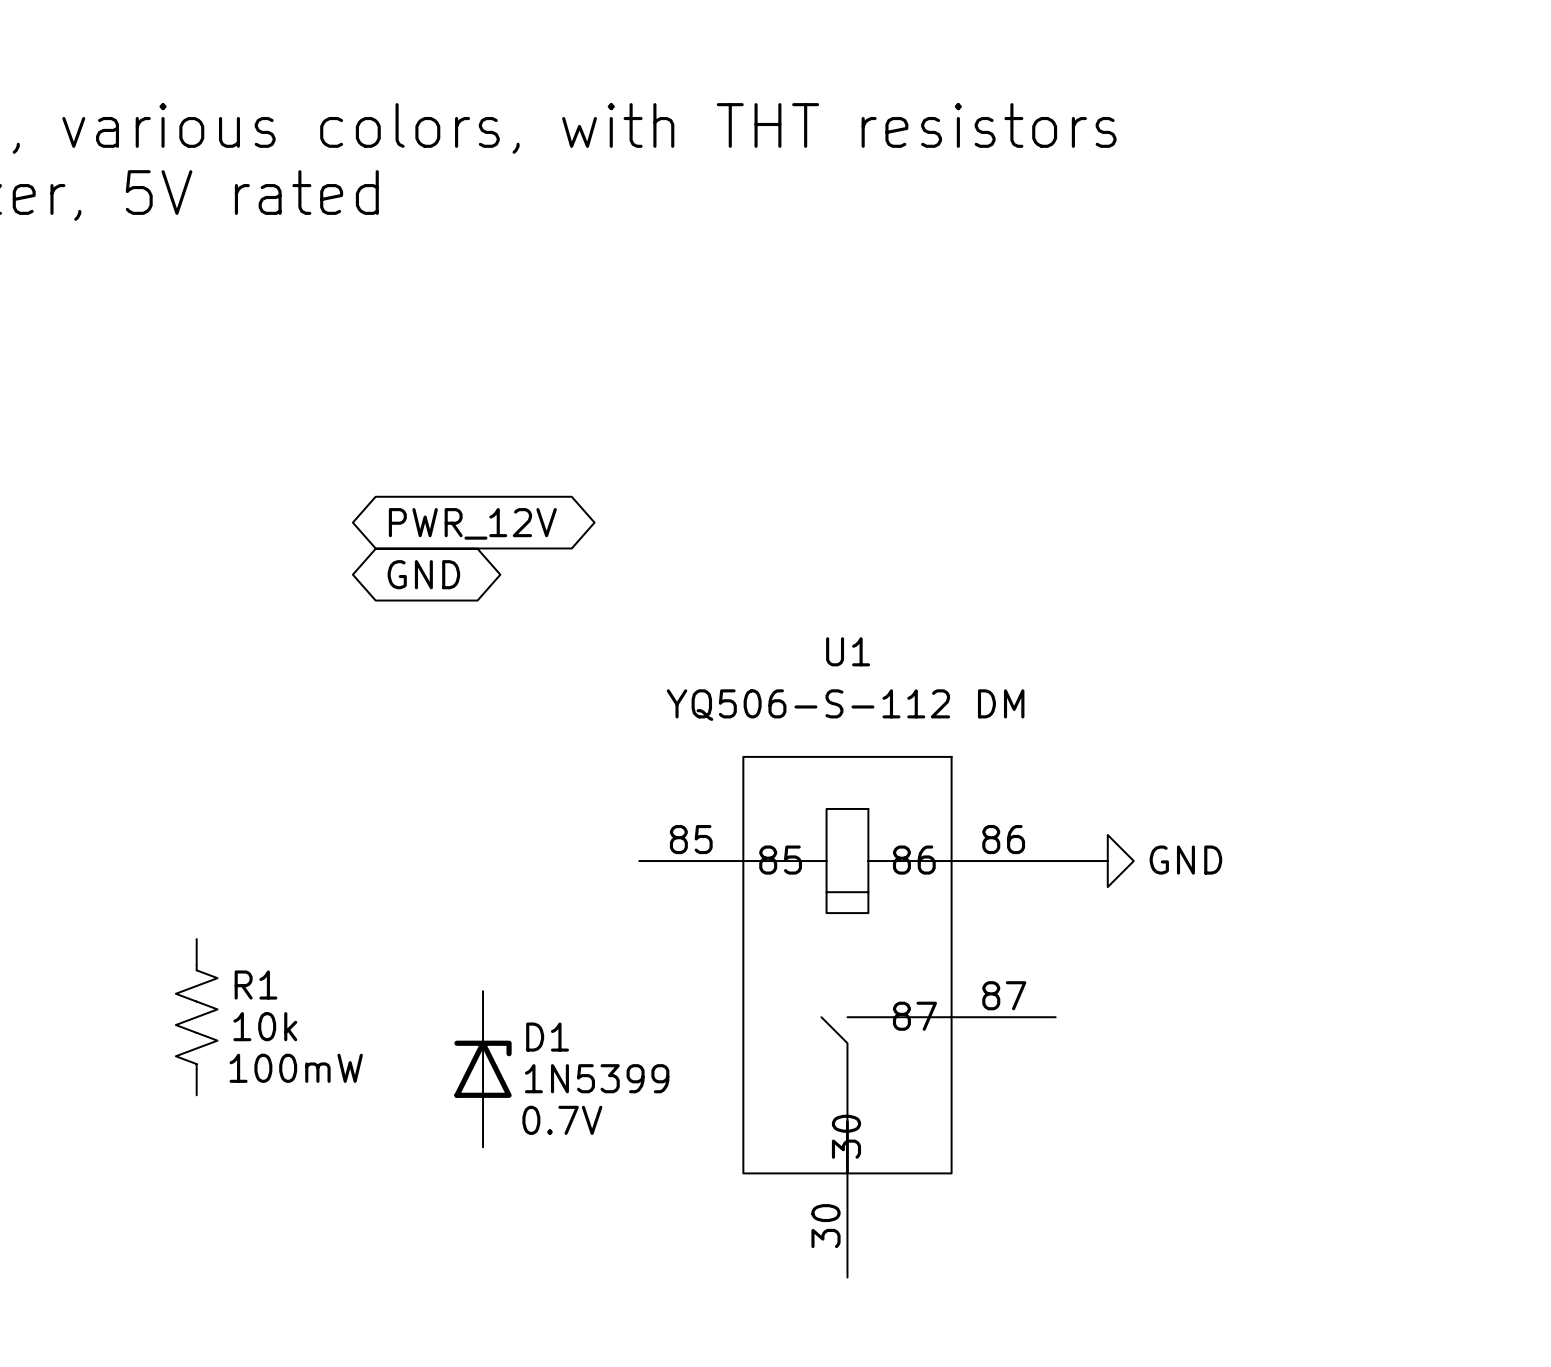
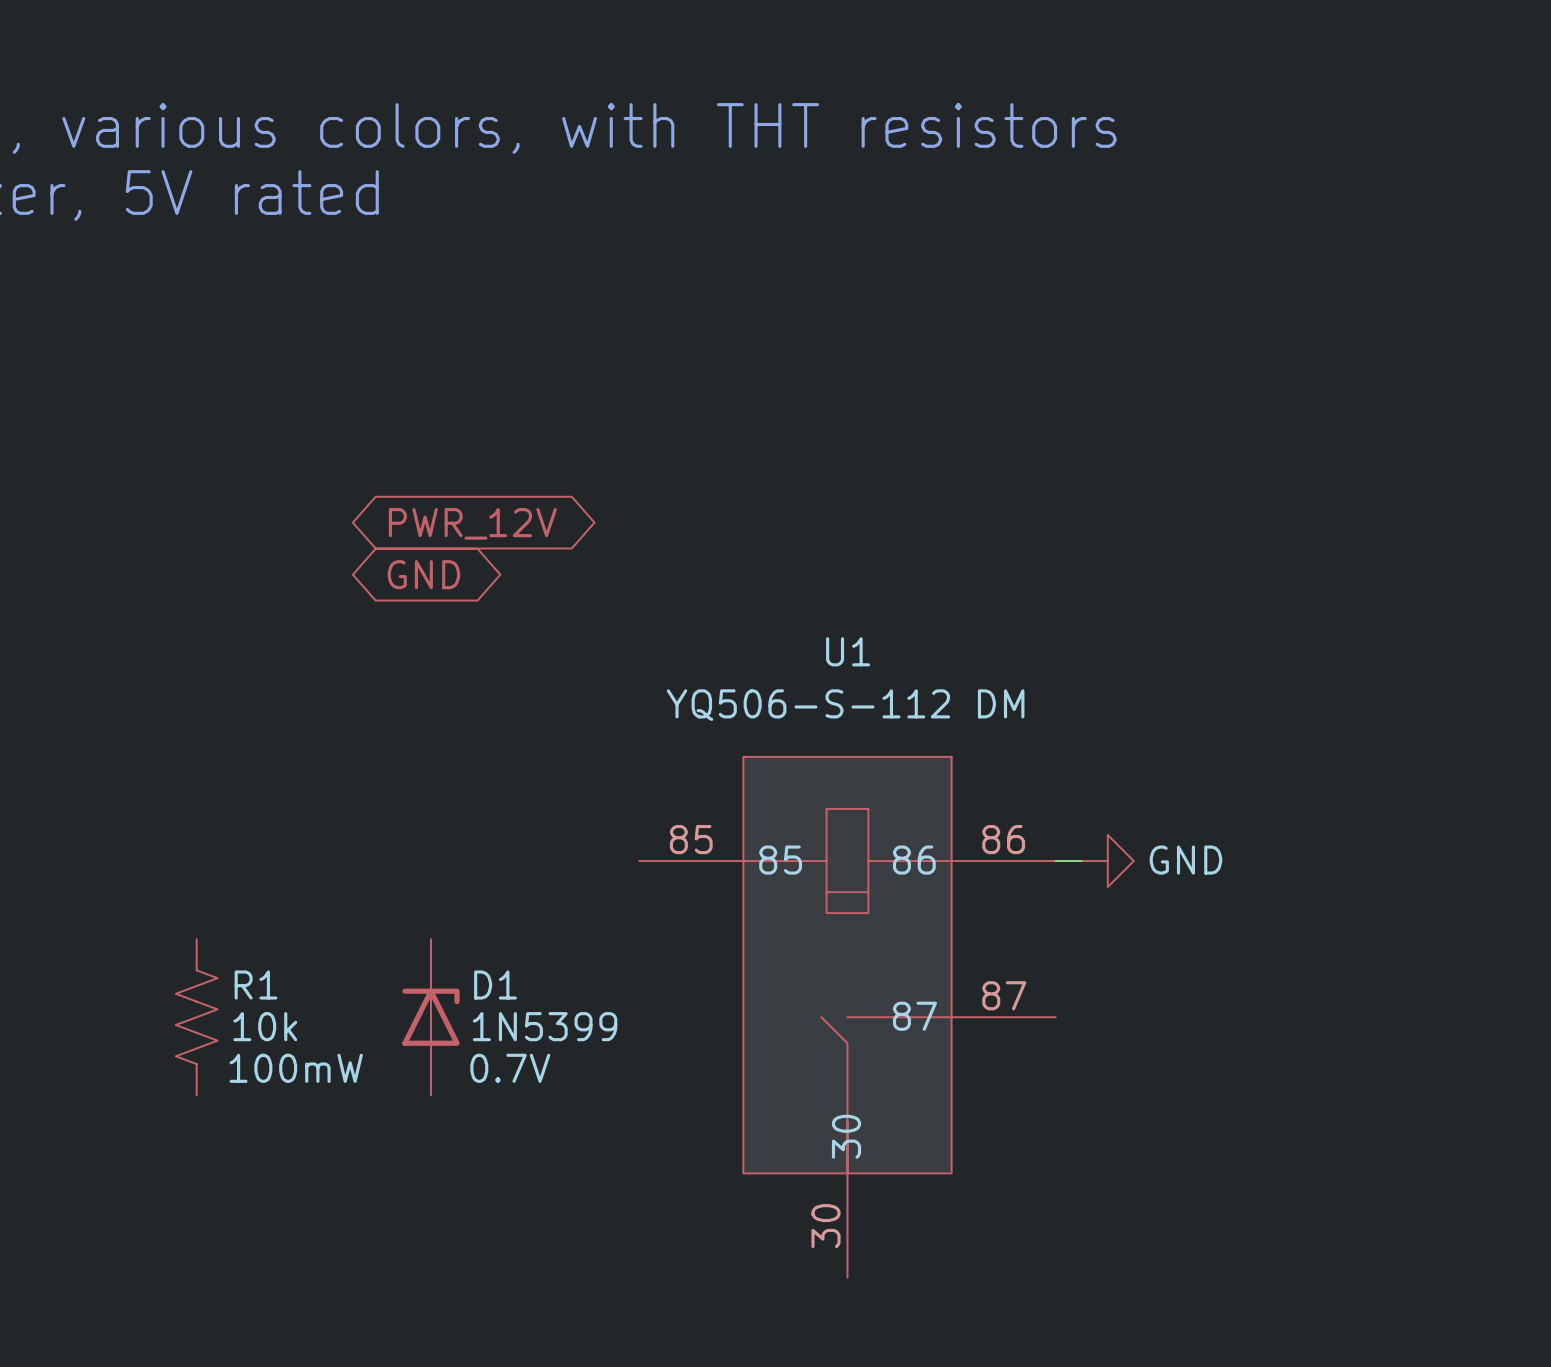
D1 position: (483, 1069) -> (430, 1017)

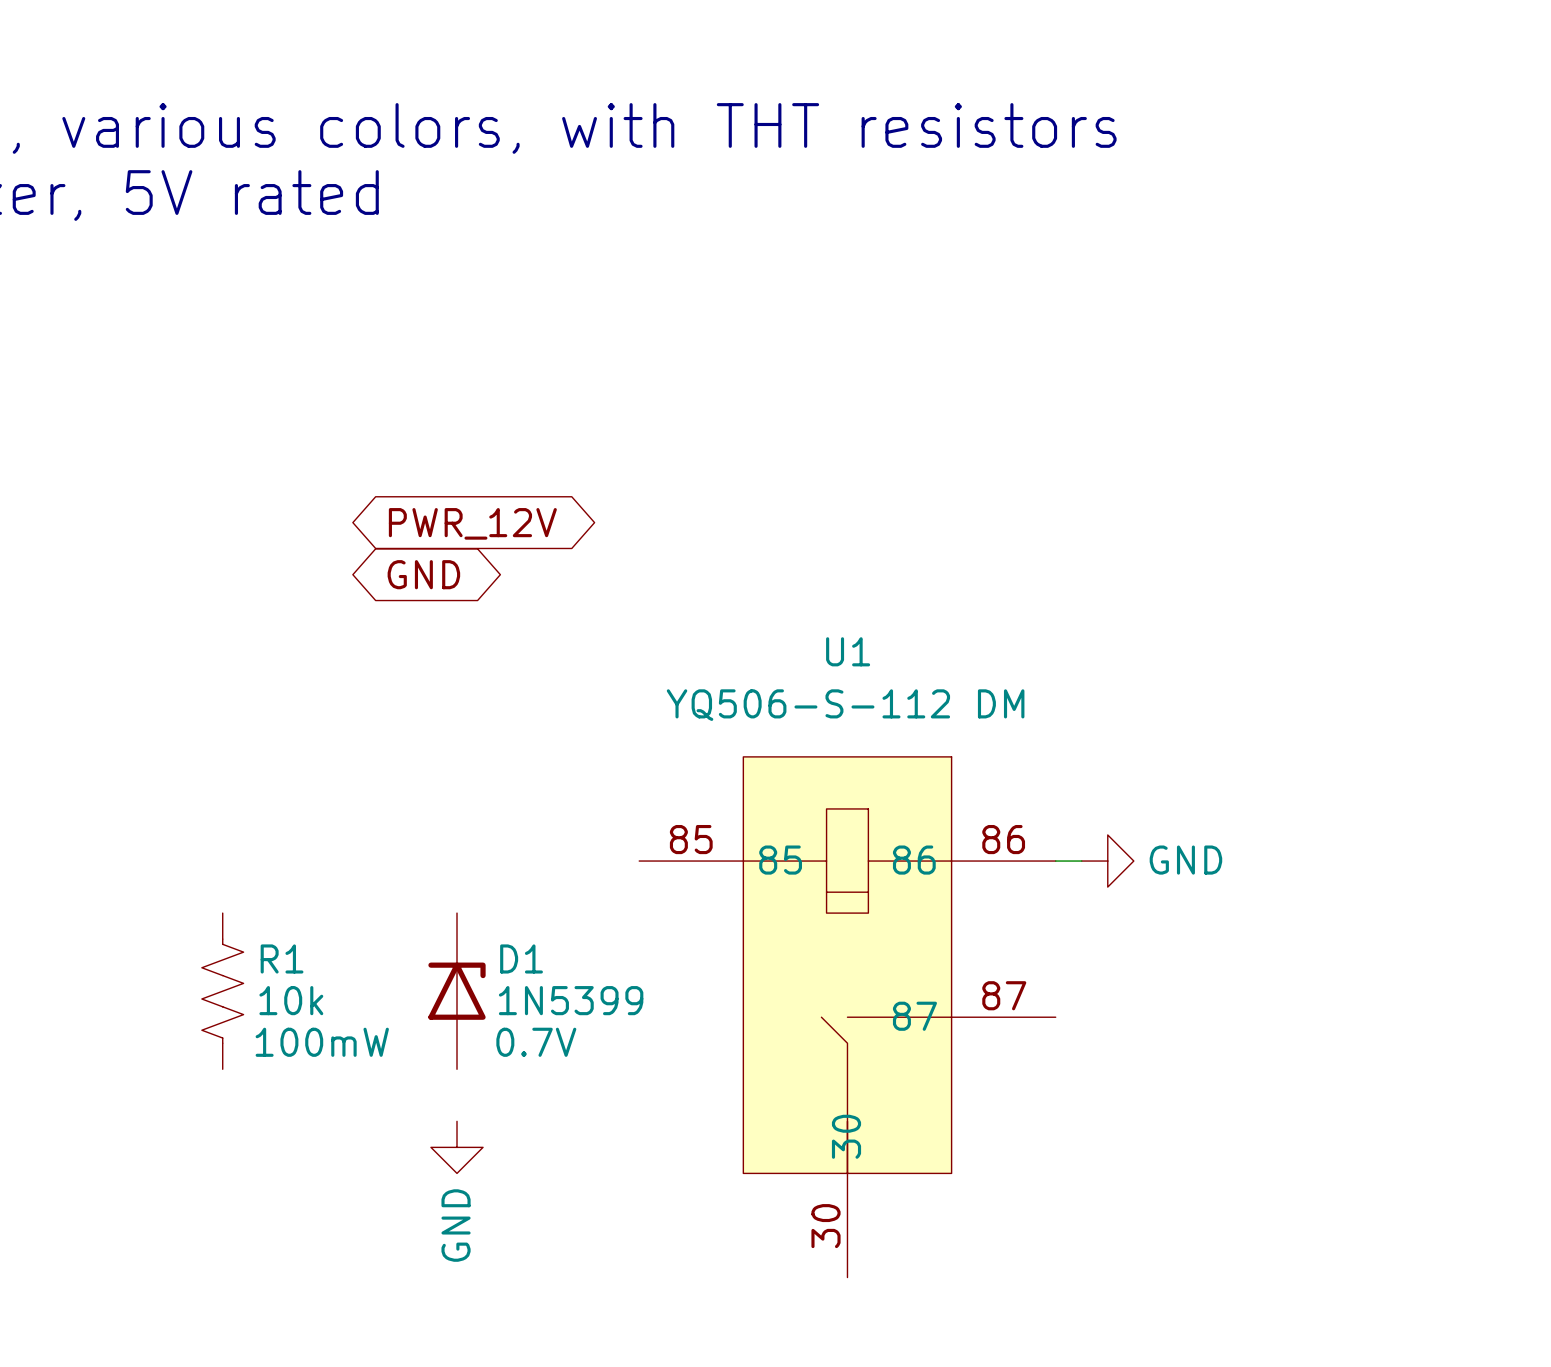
R1 position: (196, 1017) -> (222, 991)
D1 position: (430, 1017) -> (457, 991)
power symbol: none -> GND (457, 1147)

